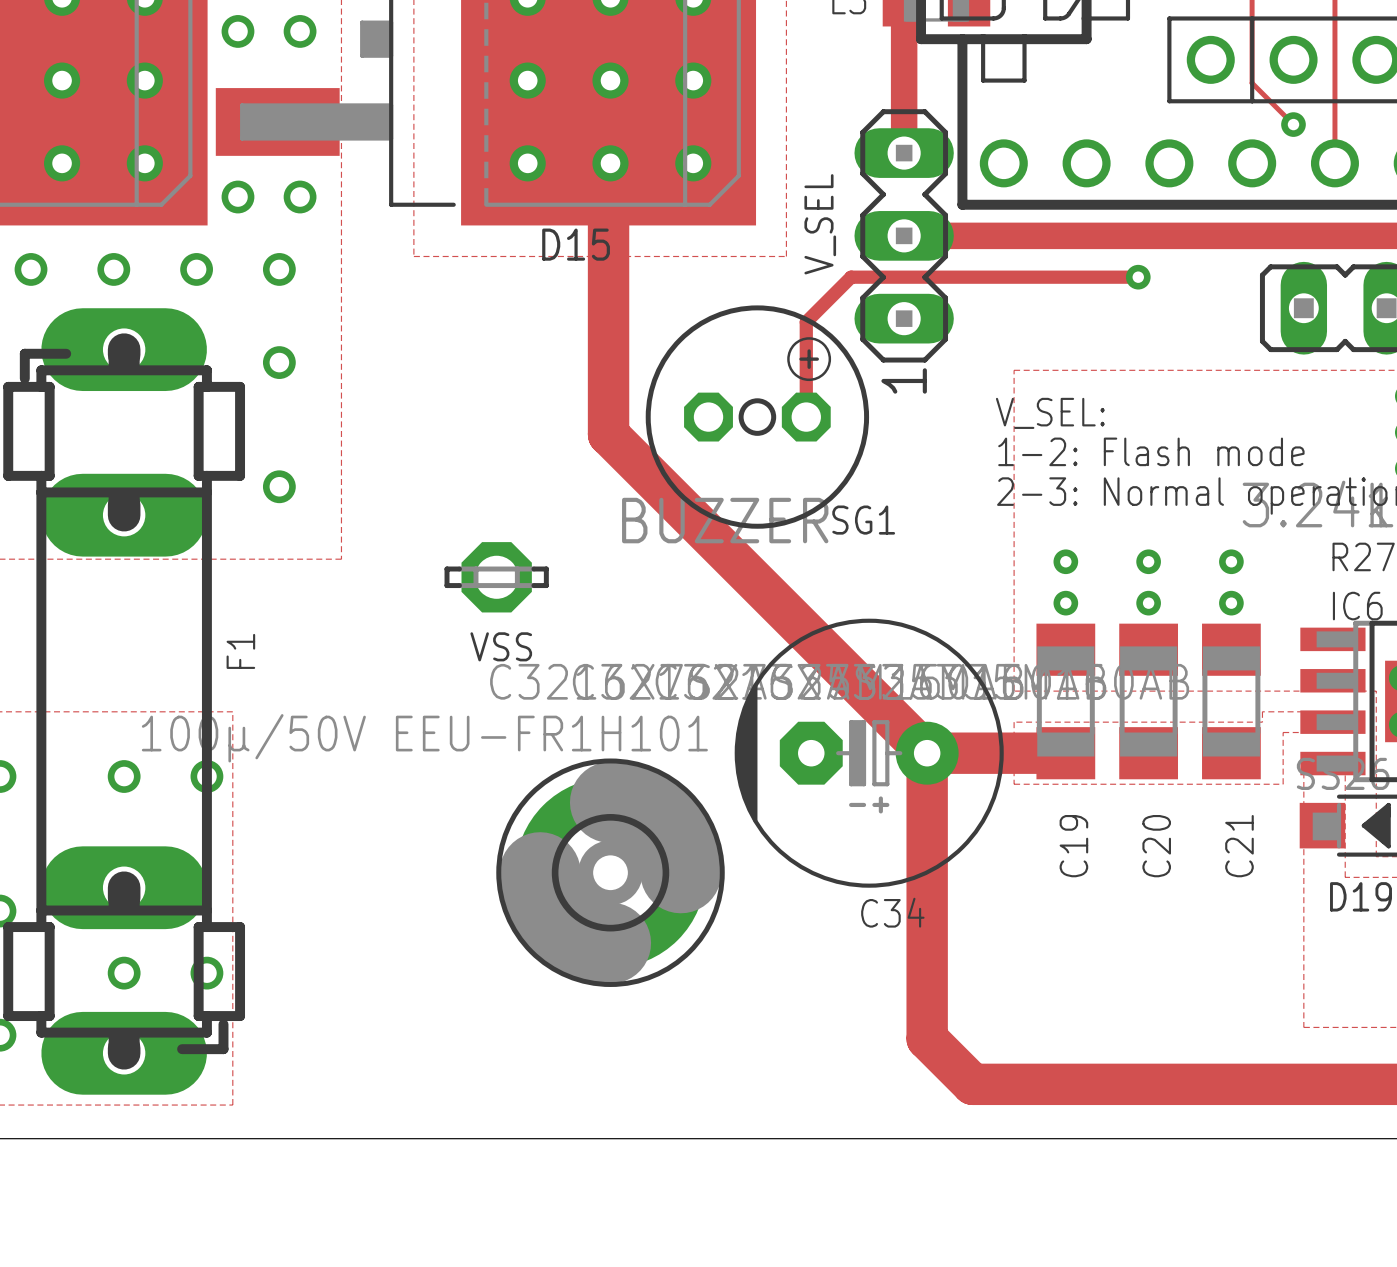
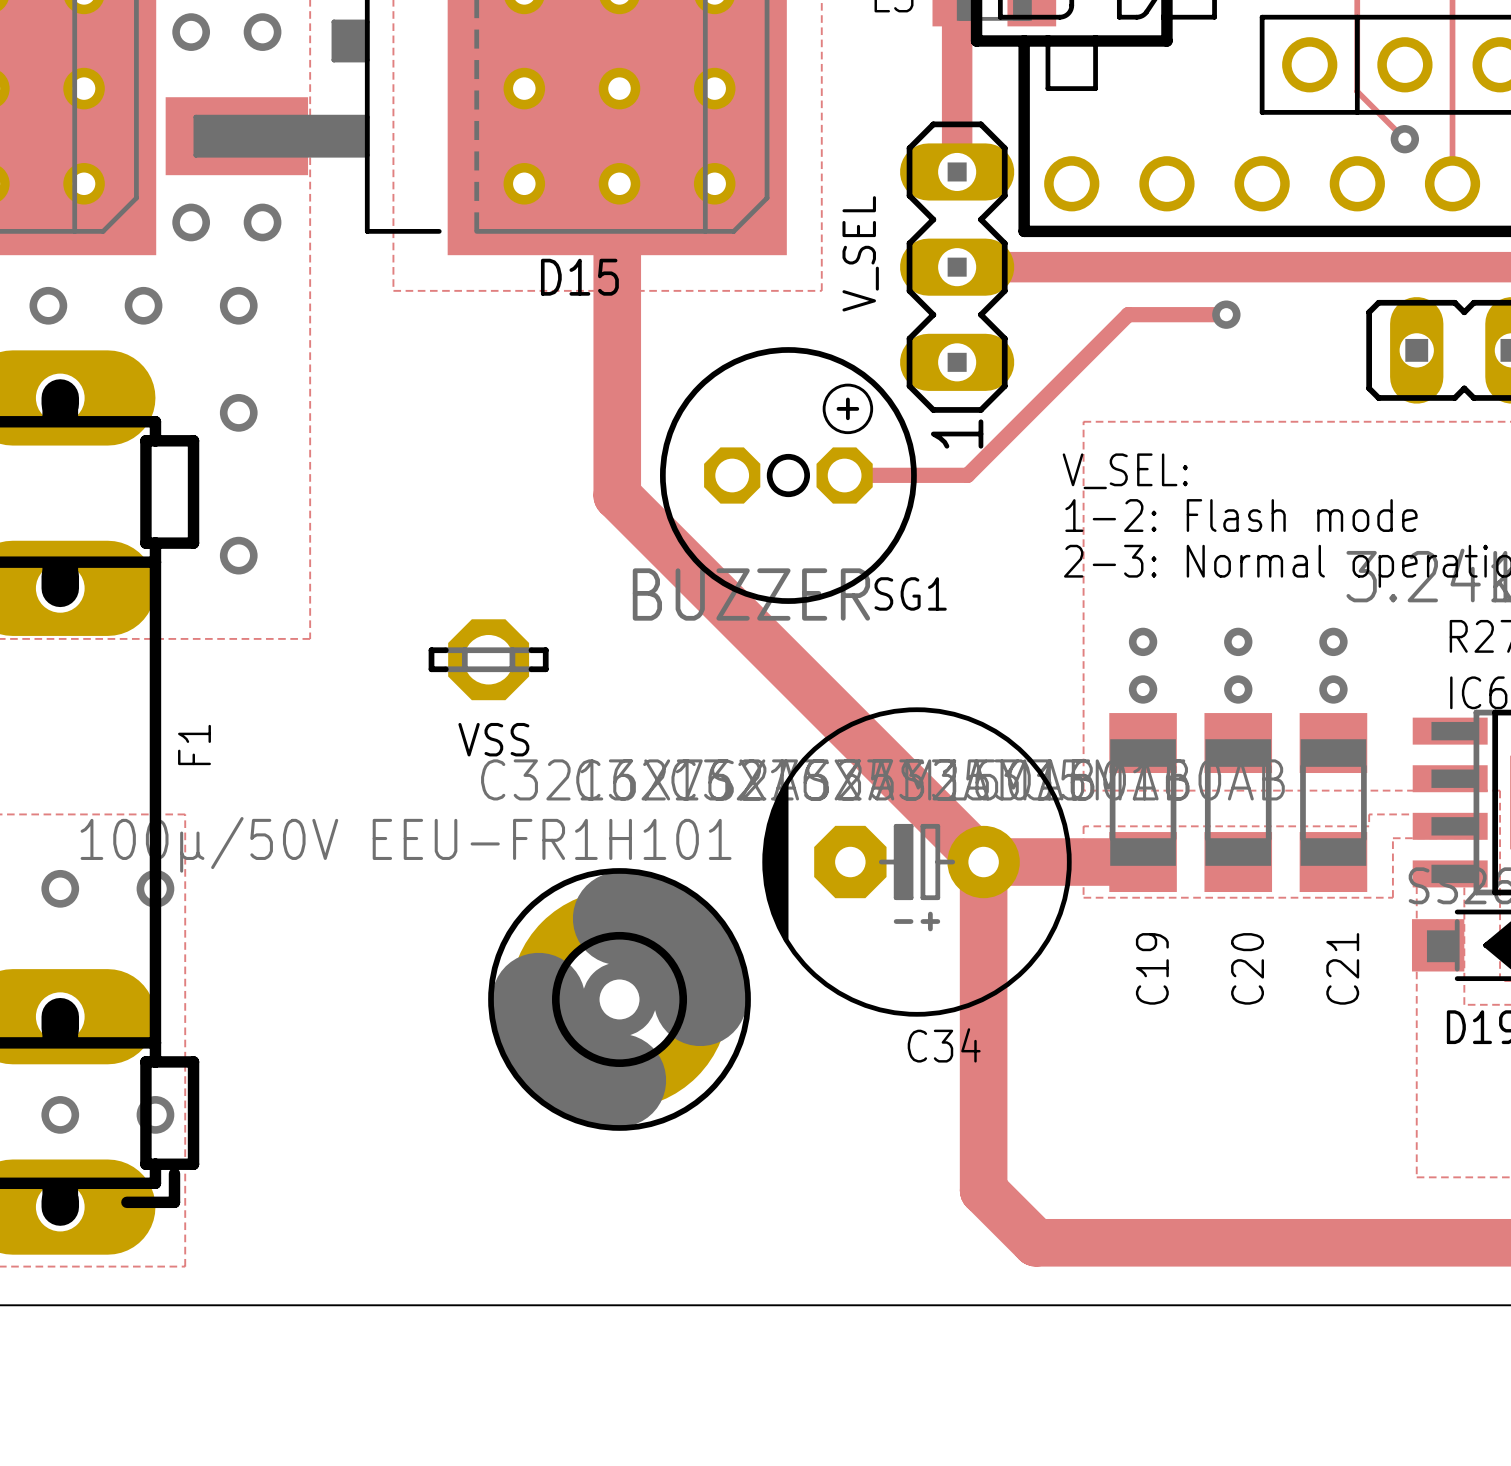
track: (1052, 277) (851, 277) (806, 322) (806, 417) -> (1128, 314) (967, 475) (844, 475)

